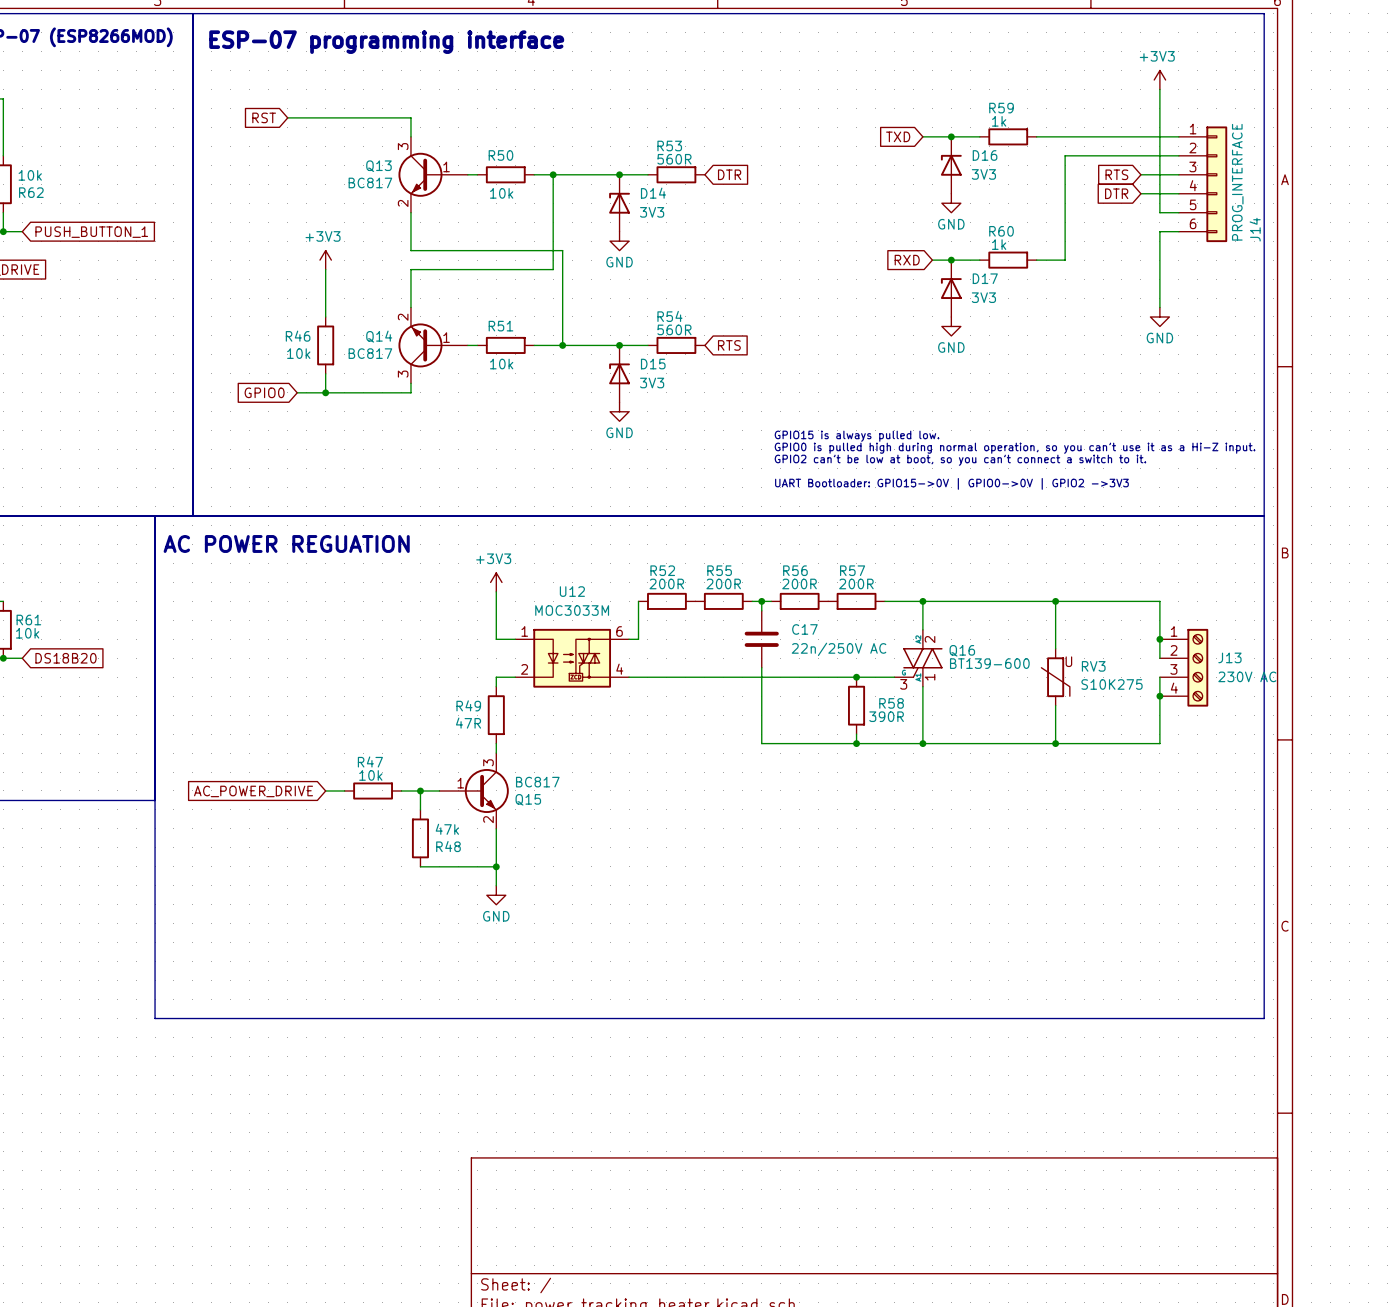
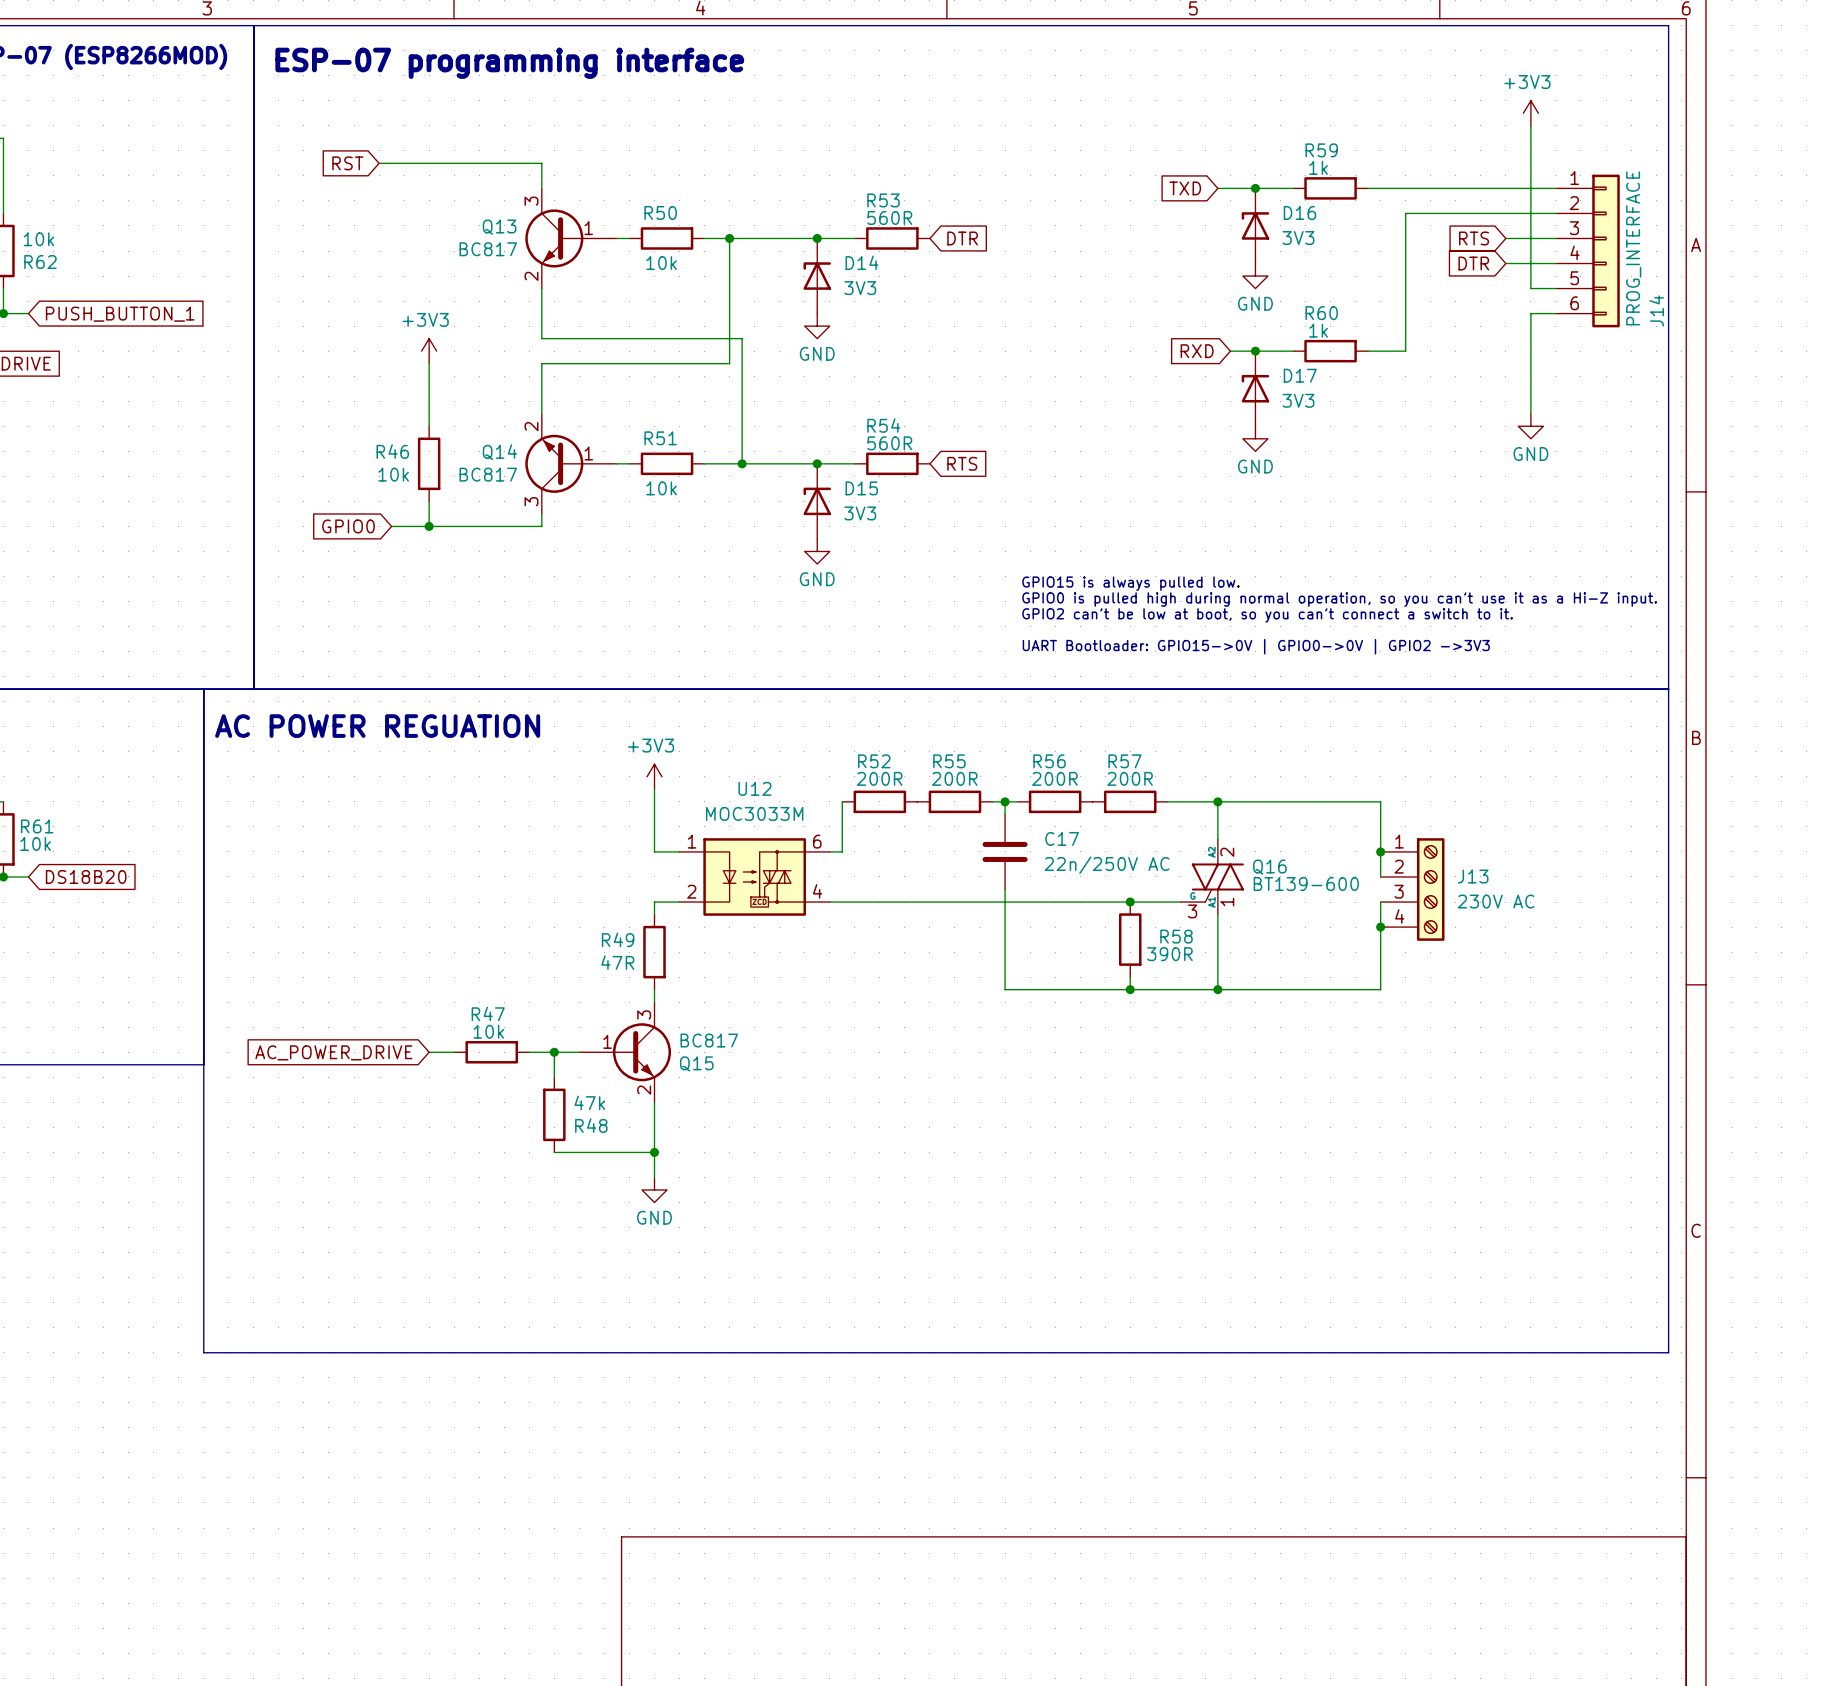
wire: (1046, 601) (1159, 601) (1159, 658) -> (1380, 801) (1380, 876)
wire: (1055, 601) (1055, 648) -> none
junction position: (1055, 601) -> (1380, 851)
junction: (1159, 639) -> none
J13 position: (1184, 667) -> (1412, 889)
RV3: S10K275 (1055, 677) -> none
wire: (1159, 677) (1159, 743) (1046, 743) -> (1380, 902) (1380, 989)
junction: none -> (1380, 927)
junction: (1159, 696) -> none
wire: (1055, 705) (1055, 743) -> none
junction: (1055, 743) -> none

